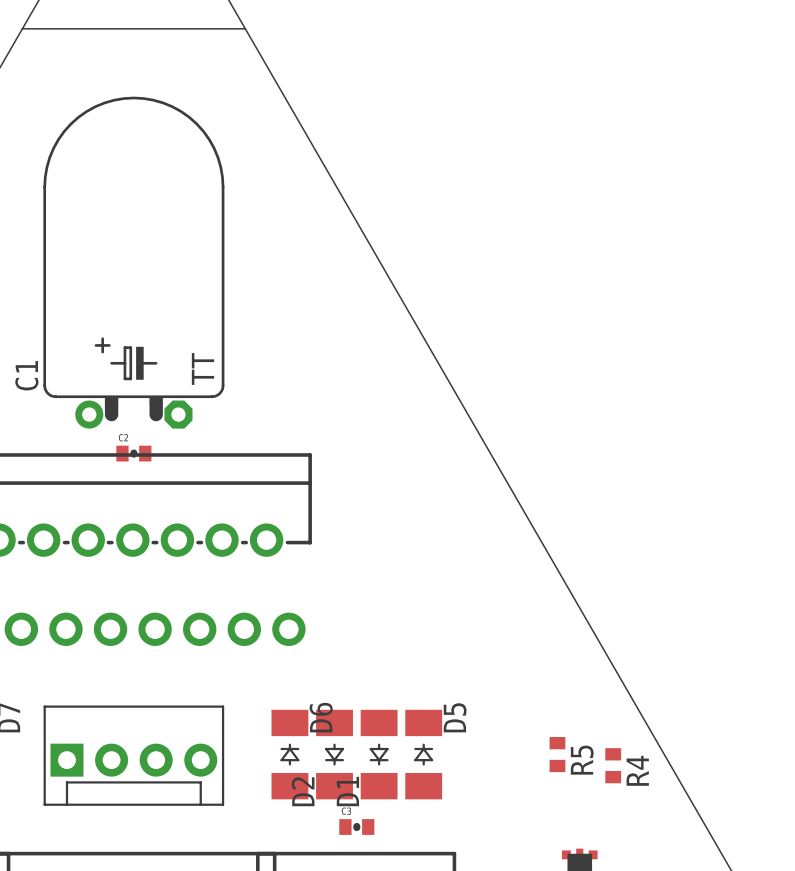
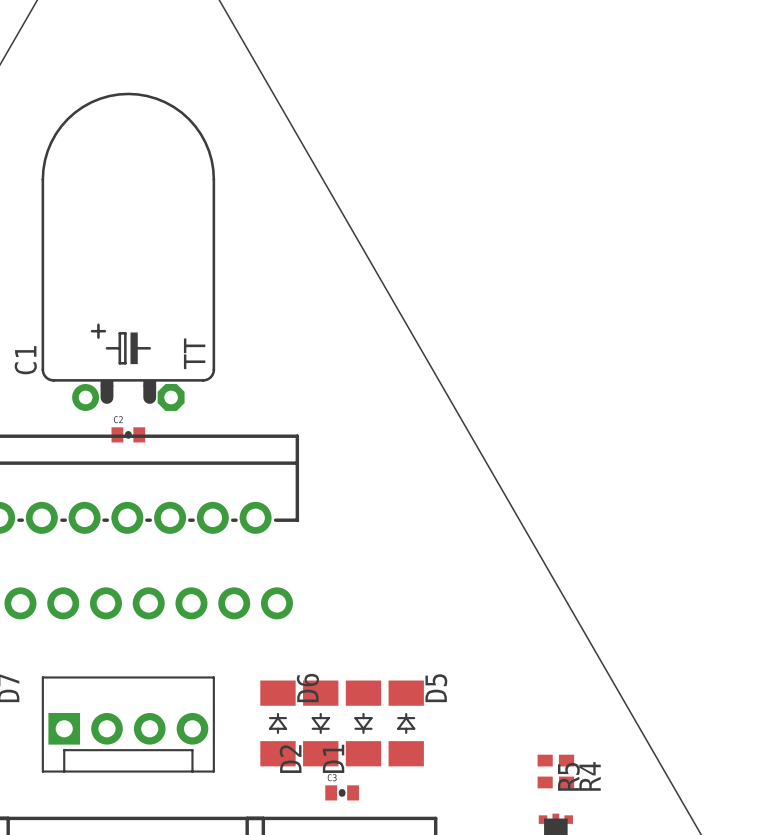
line: (22, 28) (245, 28) -> none
R5 position: (557, 754) -> (545, 771)
R4 position: (613, 765) -> (566, 771)

